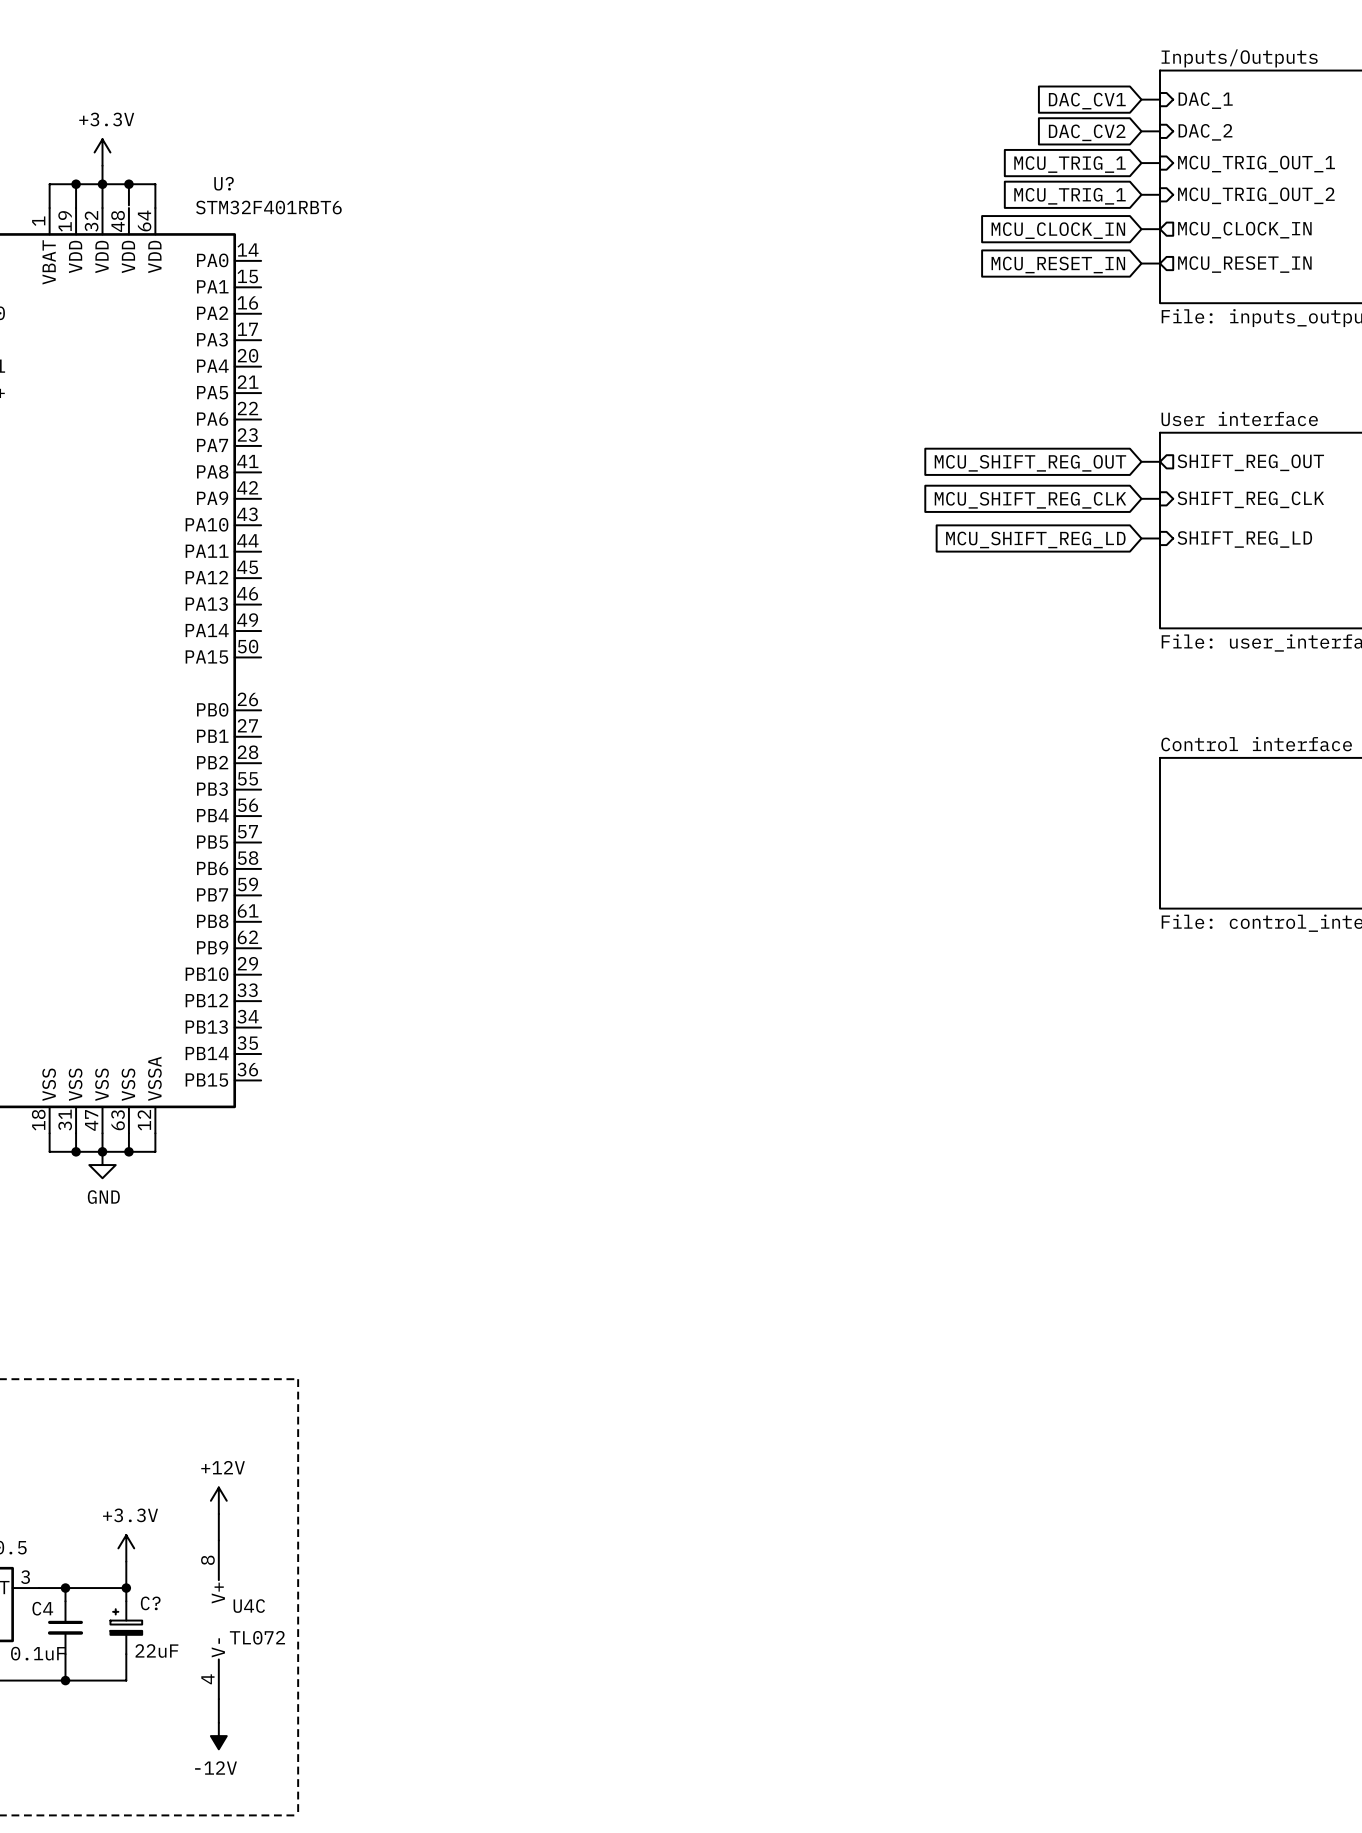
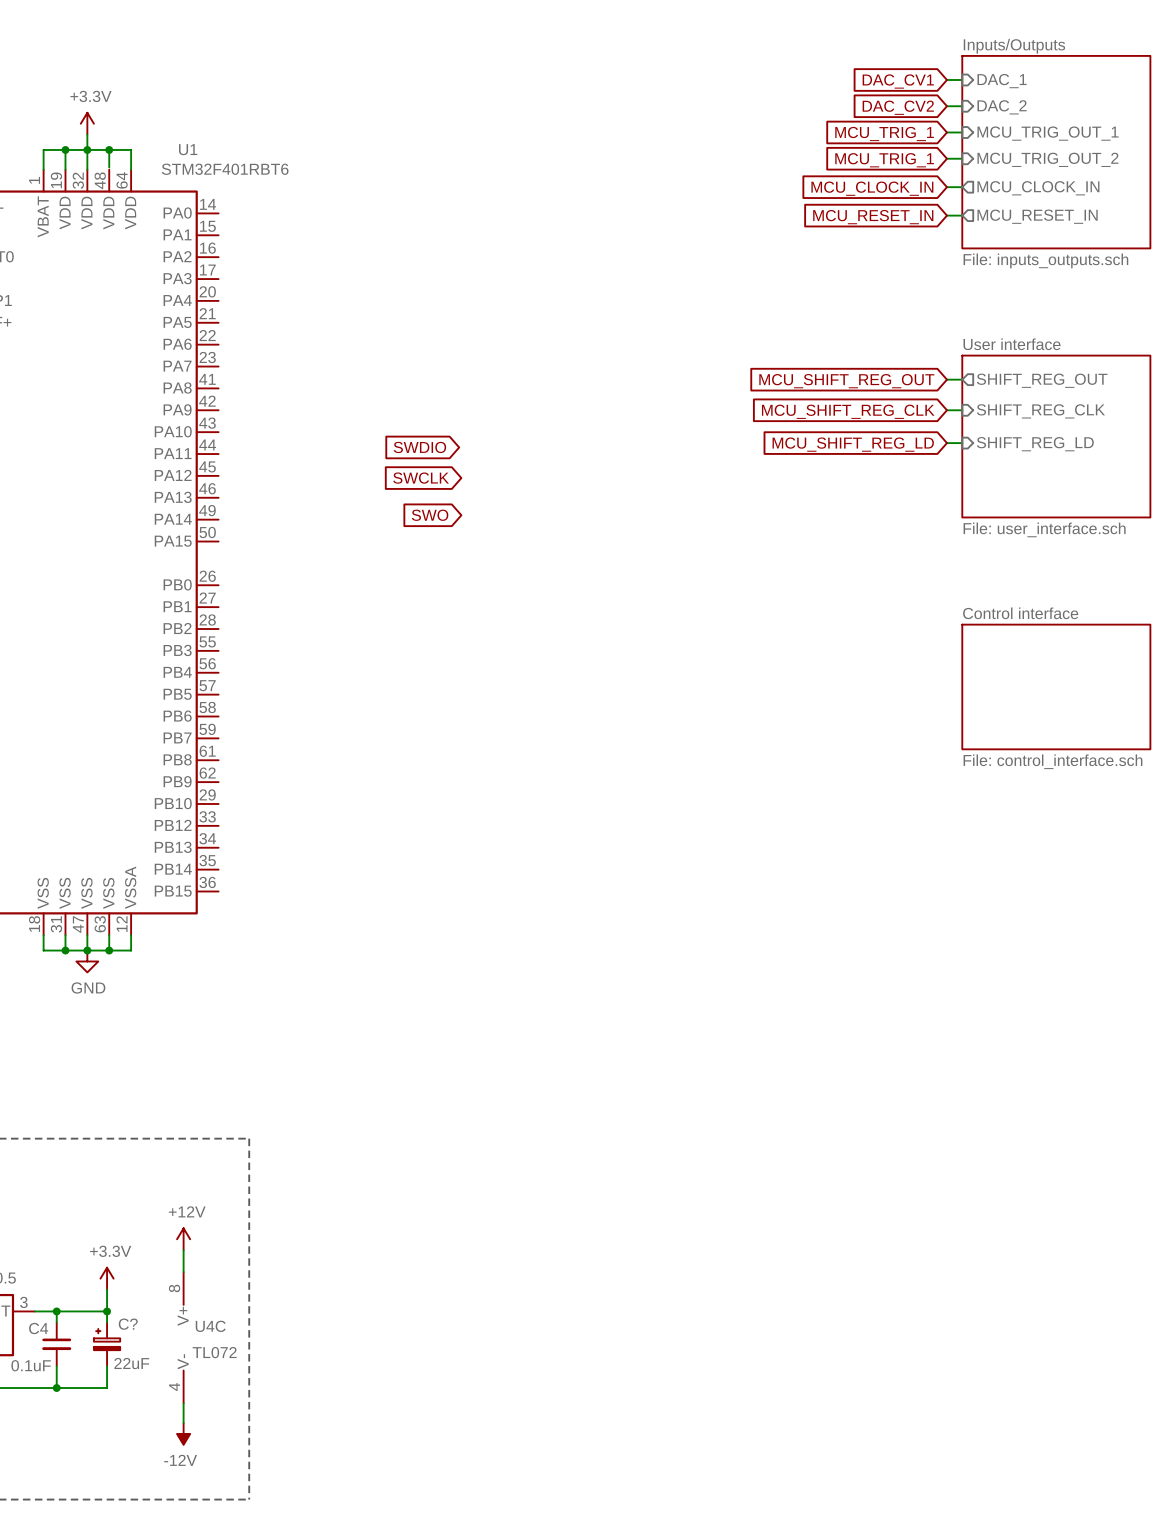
U? name: U? (224, 183) -> U1 (188, 149)
global label: none -> SWDIO (419, 447)
global label: none -> SWCLK (421, 478)
global label: none -> SWO (430, 515)

